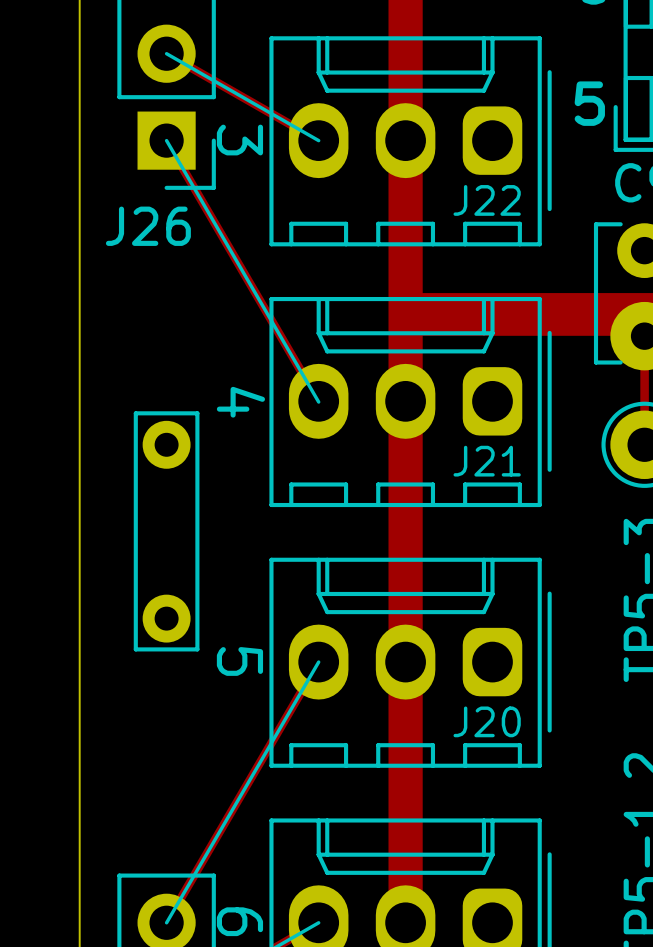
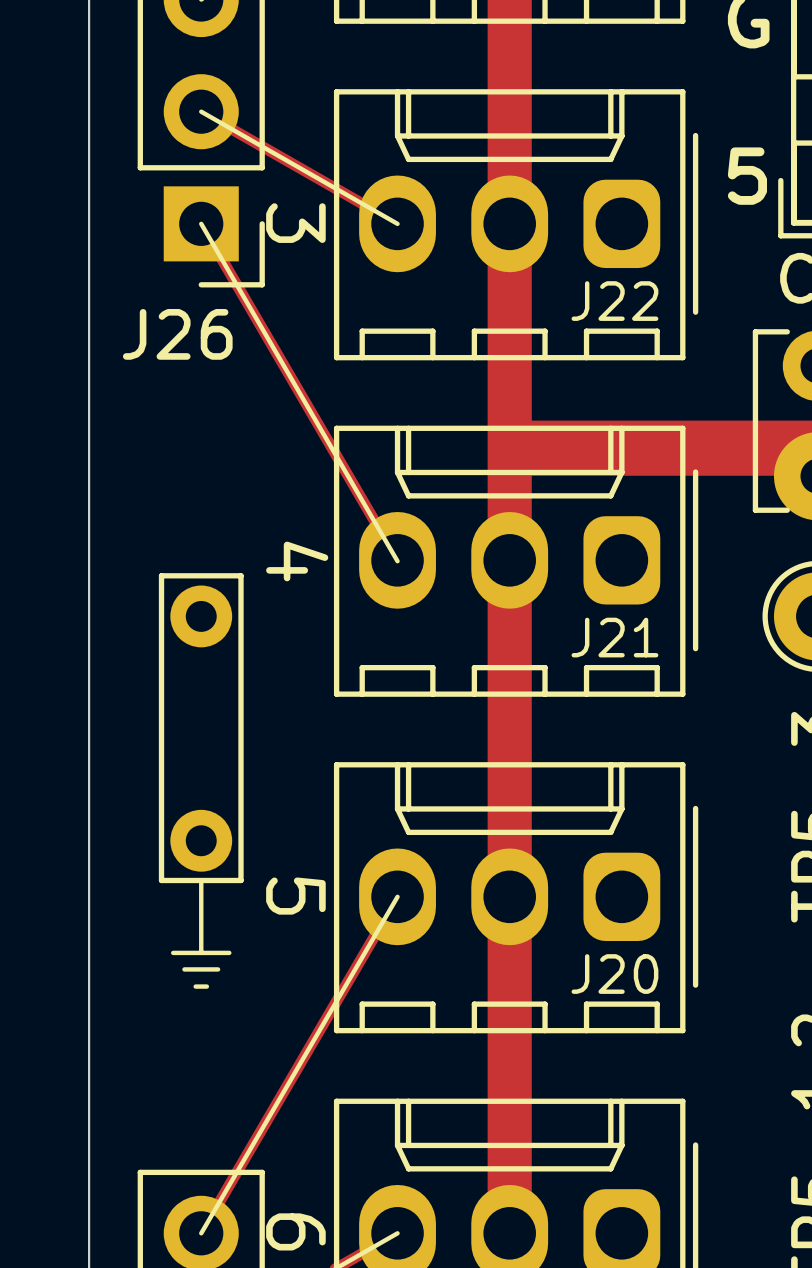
line: none -> (201, 880) (201, 952)
line: none -> (173, 952) (229, 952)
line: none -> (184, 969) (218, 969)
line: none -> (195, 986) (206, 986)

